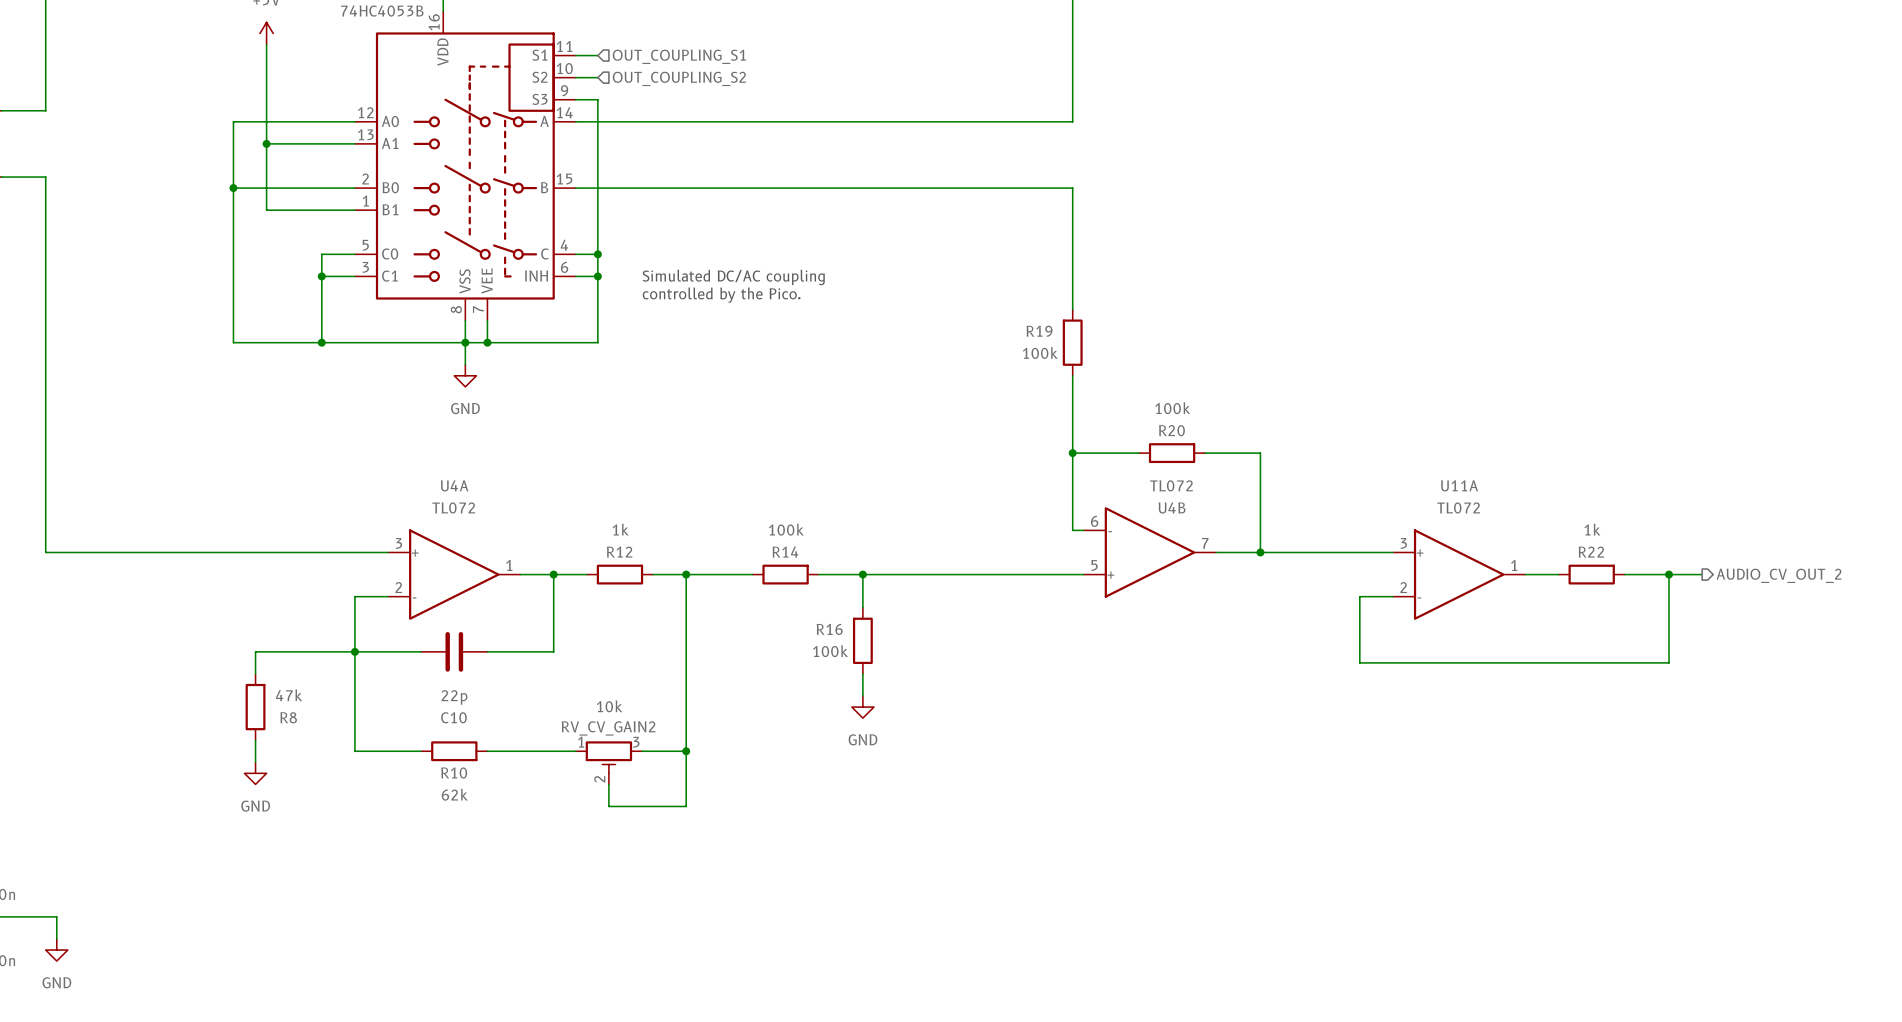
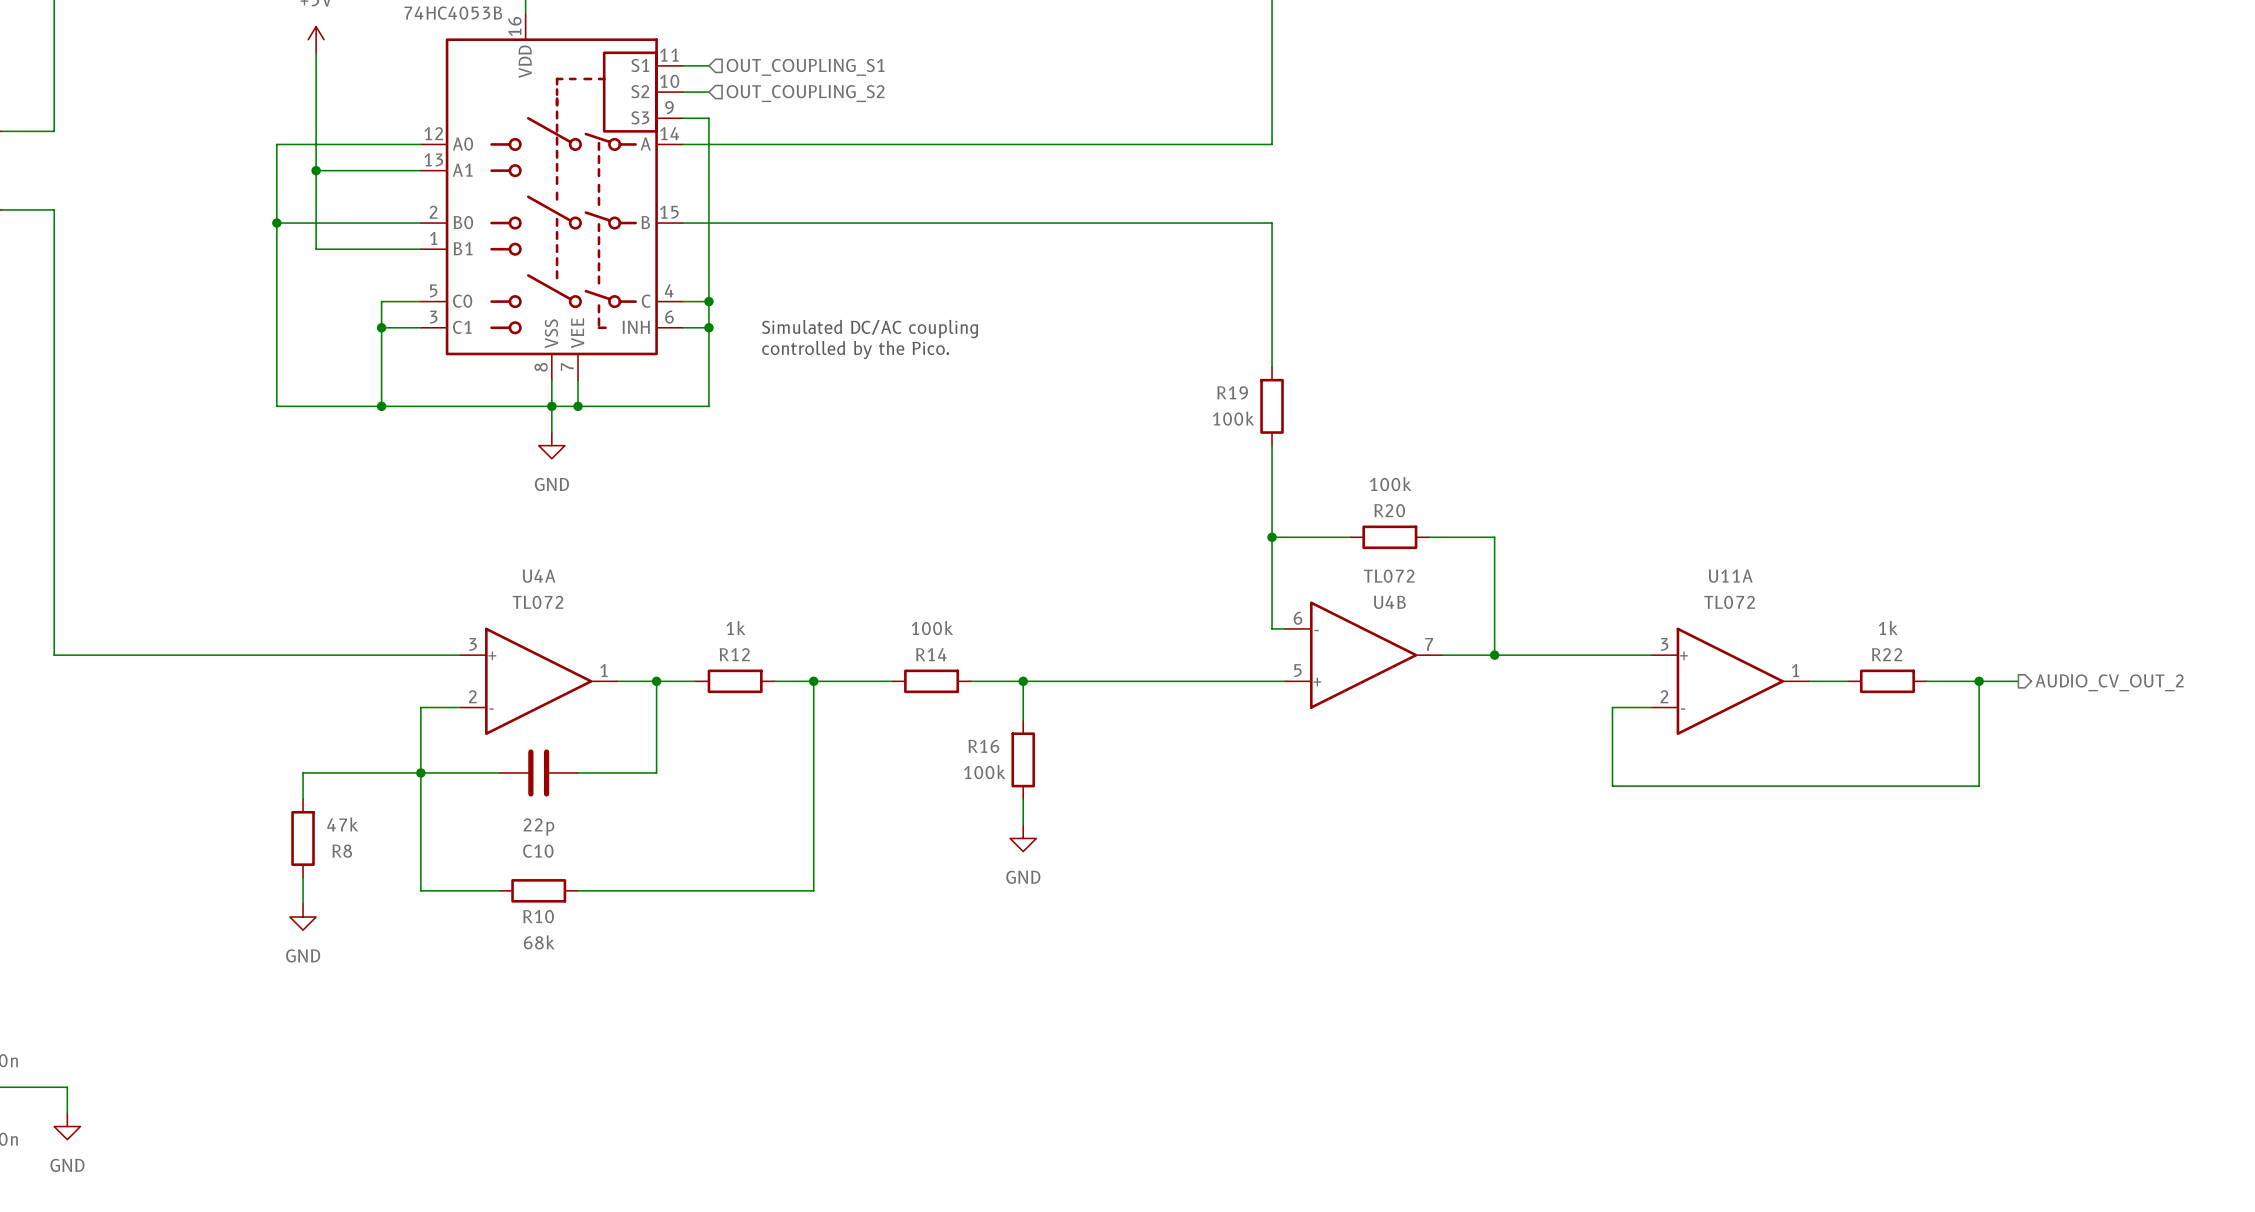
wire: none -> (682, 890) (761, 890)
wire: (686, 751) (686, 806) (608, 806) (608, 784) -> none
junction: (686, 751) -> none
RV_CV_GAIN2: 10k (608, 762) -> none
R10 value: 62k (454, 794) -> 68k (539, 942)

